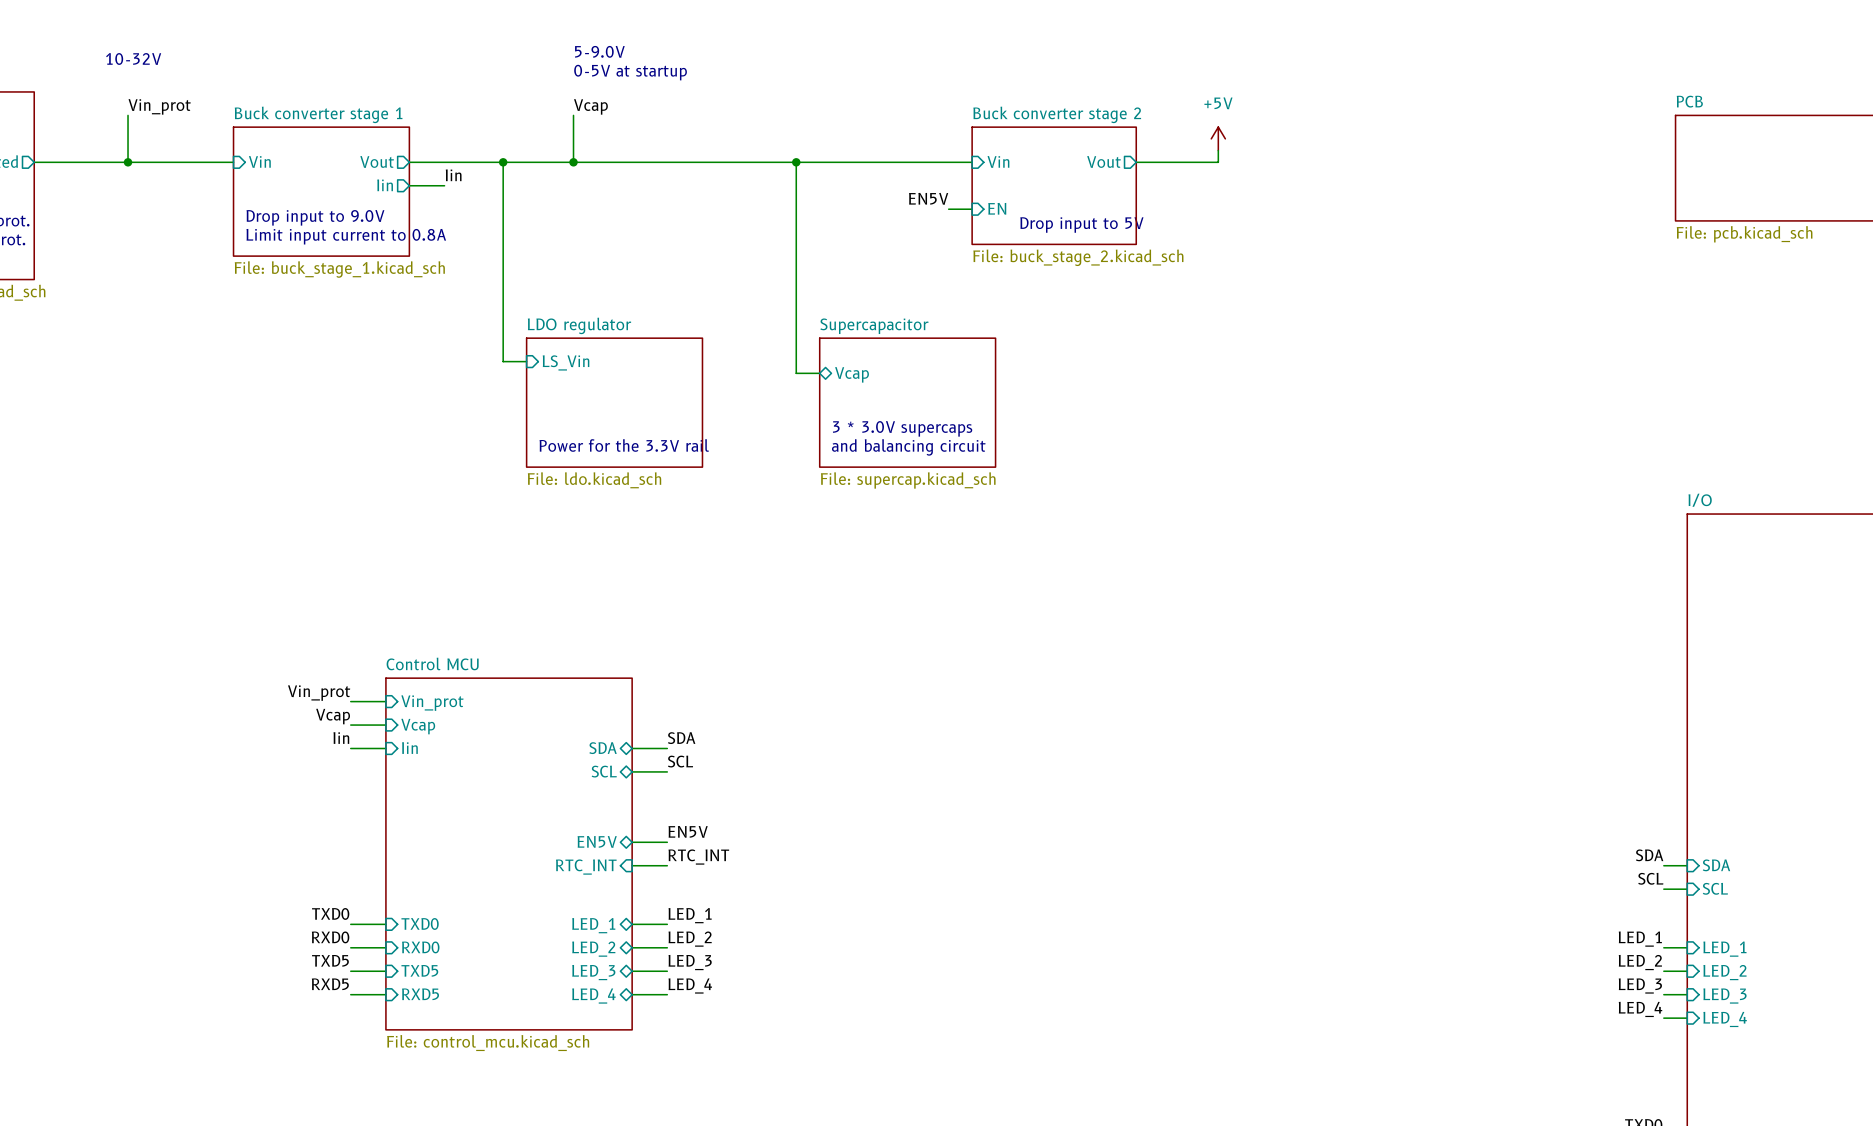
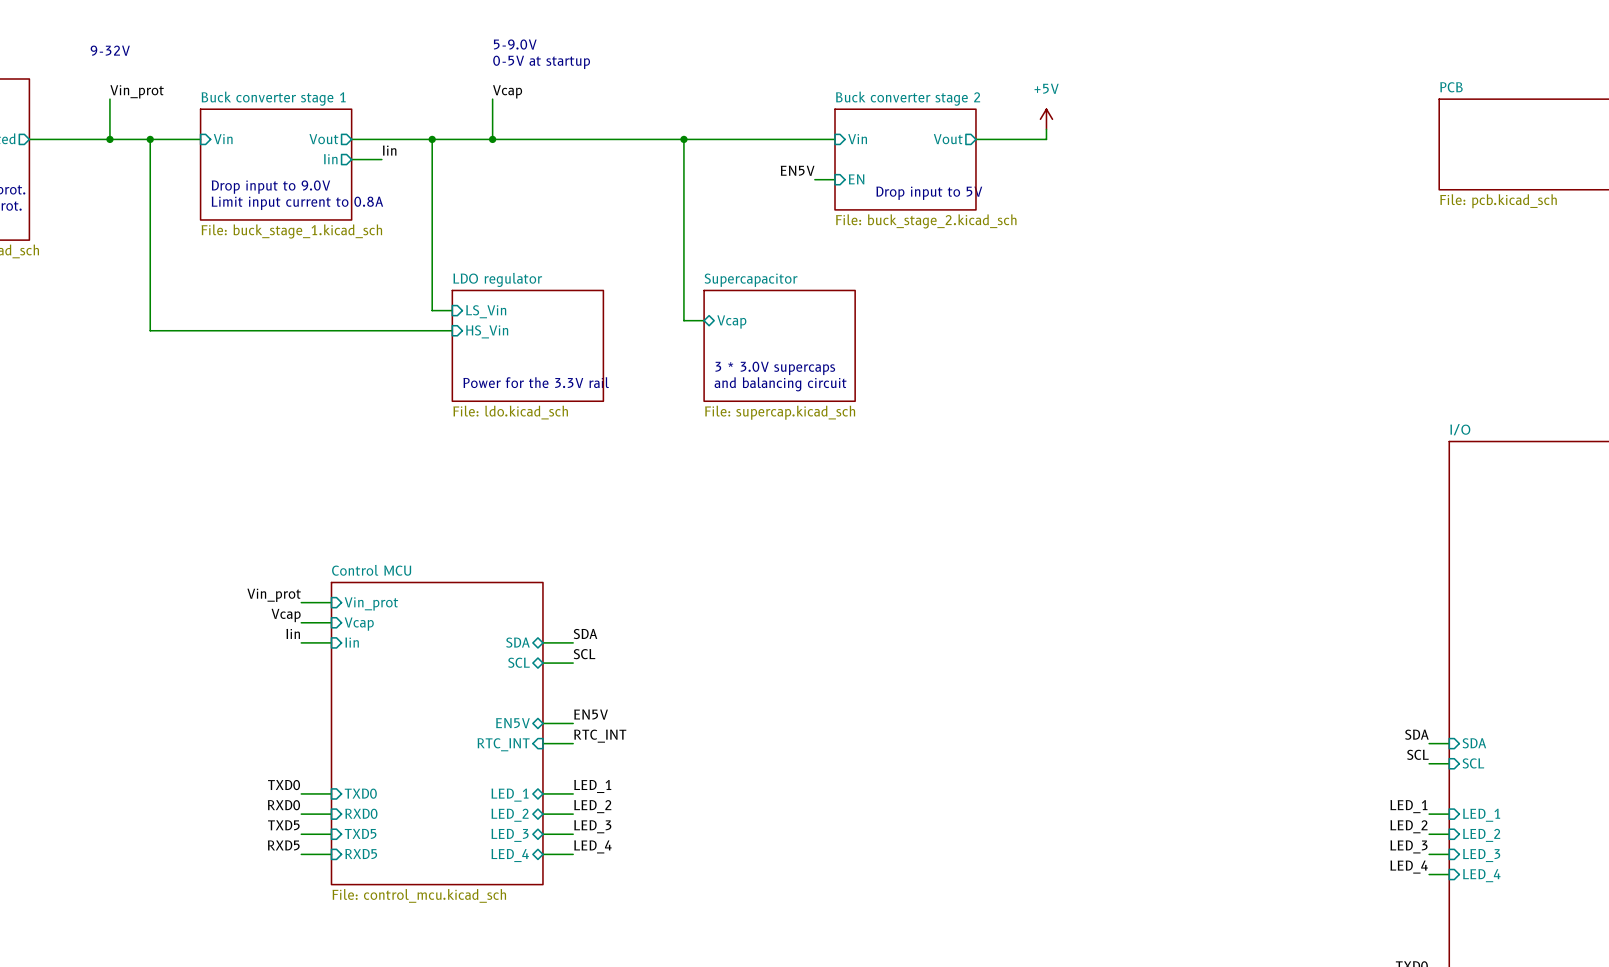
text: 10-32V (133, 58) -> 9-32V (110, 50)
wire: none -> (150, 139) (150, 330) (452, 330)
junction: none -> (150, 139)
sheet pin: none -> HS_Vin (487, 331)

